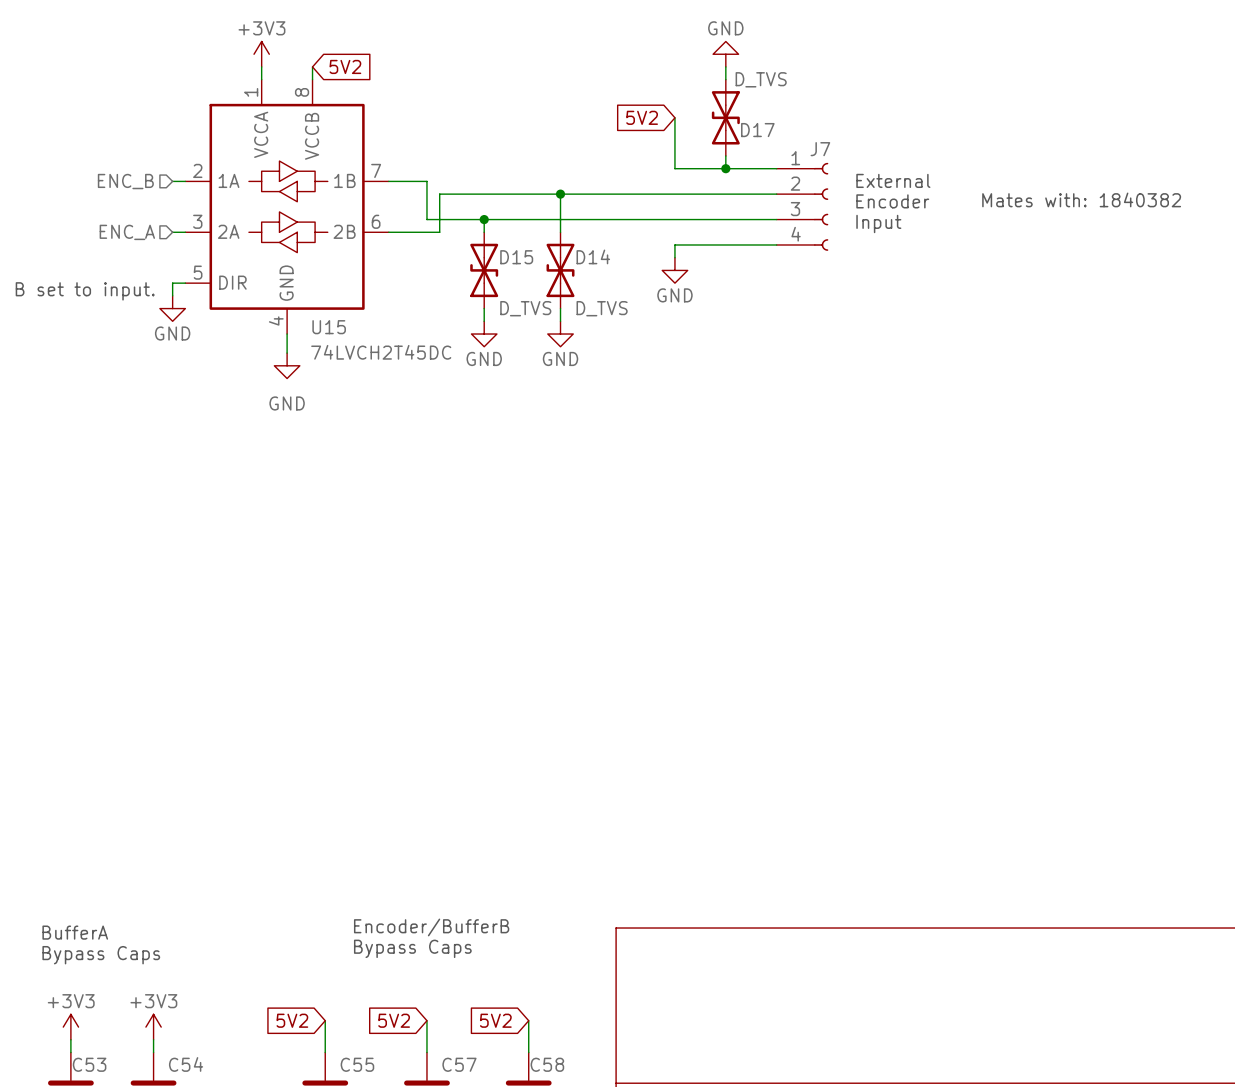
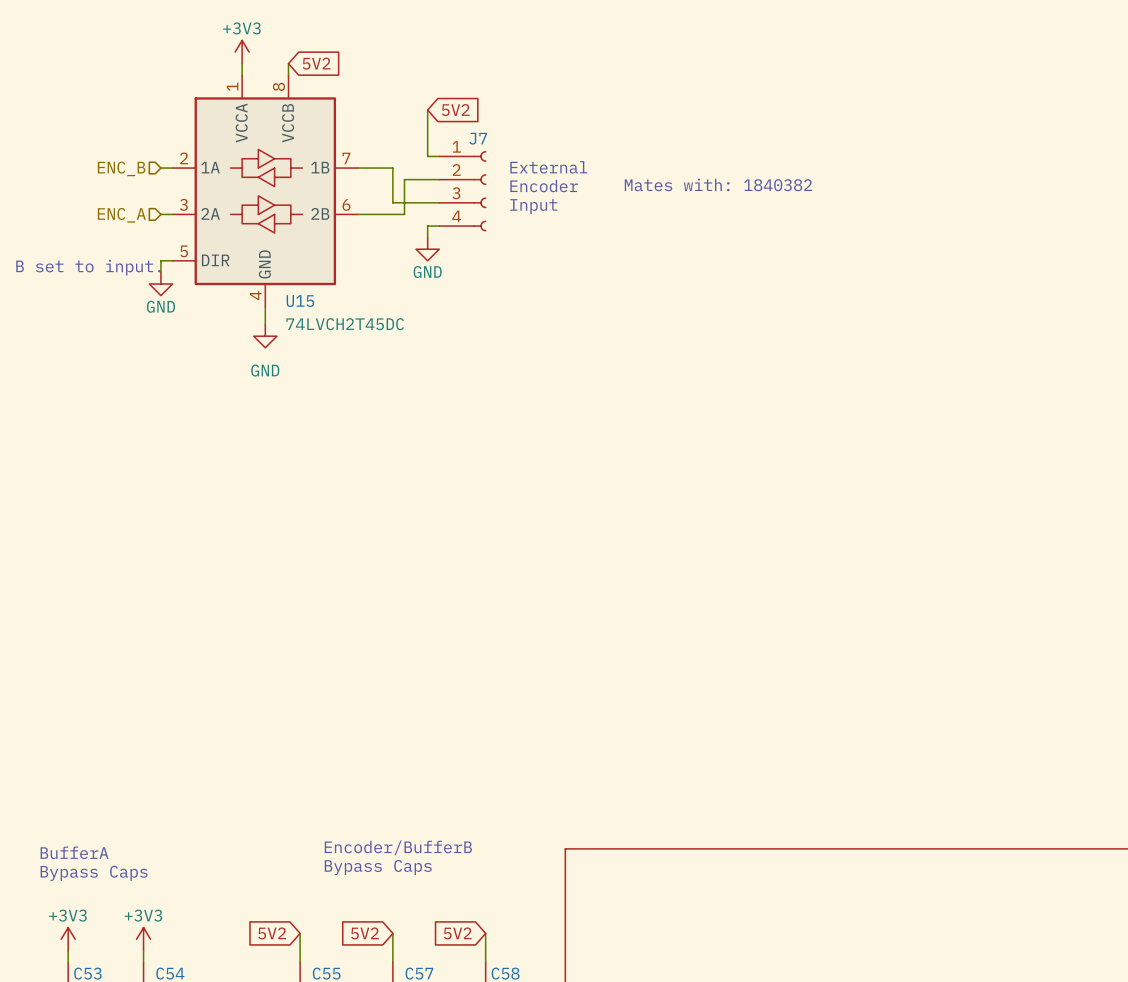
power symbol: GND (725, 54) -> none
wire: (725, 66) (725, 79) -> none
wire: none -> (427, 110) (427, 156) (439, 156)
global label rotation: 0° (642, 117) -> 180° (455, 110)
global label position: 5V2 (642, 117) -> 5V2 (455, 110)
wire: (674, 117) (674, 168) (776, 168) -> none
D17: D_TVS (725, 117) -> none
wire: (725, 155) (725, 168) -> none
junction: (725, 168) -> none
text: none -> External (548, 167)
text: External (893, 180) -> none
wire: (477, 194) (776, 194) -> none
wire: (560, 194) (560, 232) -> none
junction: (560, 194) -> none
text: none -> Mates with: 1840382 (718, 184)
text: Mates with: 1840382 (1081, 199) -> none
text: none -> Encoder (544, 186)
text: Encoder (892, 201) -> none
J7 position: (802, 206) -> (462, 191)
wire: (477, 219) (776, 219) -> none
wire: (484, 219) (484, 232) -> none
junction: (484, 219) -> none
text: none -> Input (533, 206)
text: Input (878, 223) -> none
wire: none -> (439, 226) (427, 226) (427, 237)
wire: (776, 244) (674, 244) (674, 257) -> none
power symbol: none -> GND (427, 249)
D15: D_TVS (484, 270) -> none
D14: D_TVS (560, 270) -> none
power symbol: GND (674, 270) -> none
wire: (484, 308) (484, 321) -> none
wire: (560, 308) (560, 321) -> none
power symbol: GND (484, 334) -> none
power symbol: GND (560, 334) -> none

